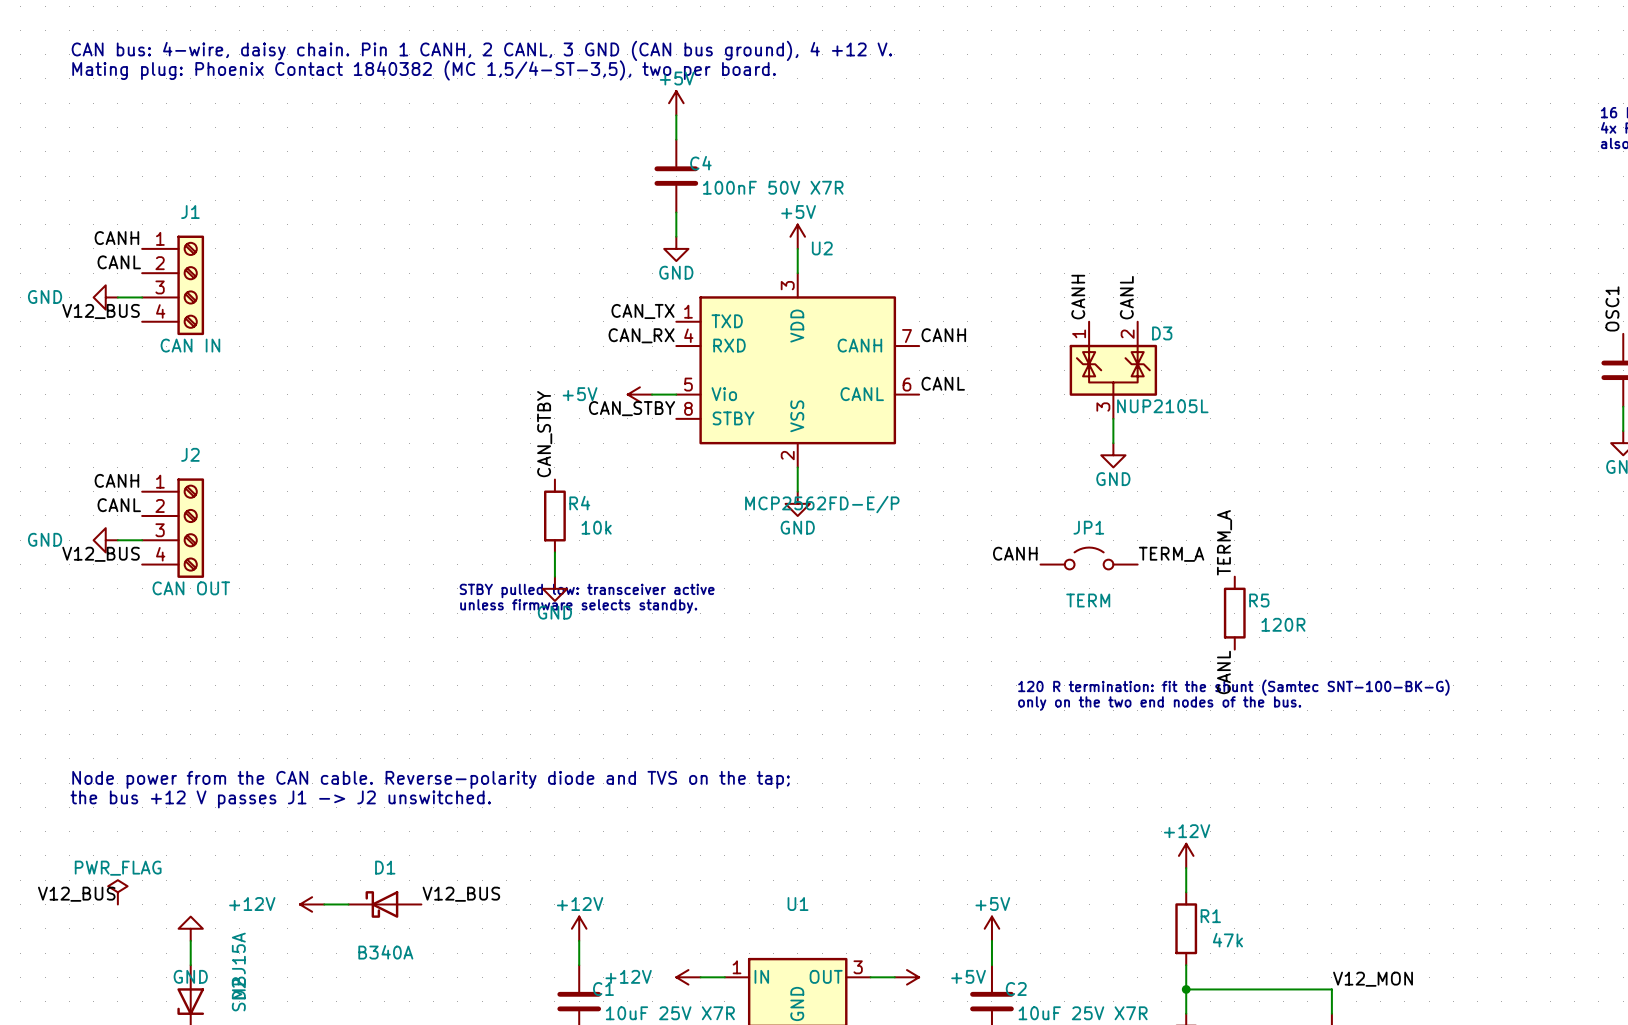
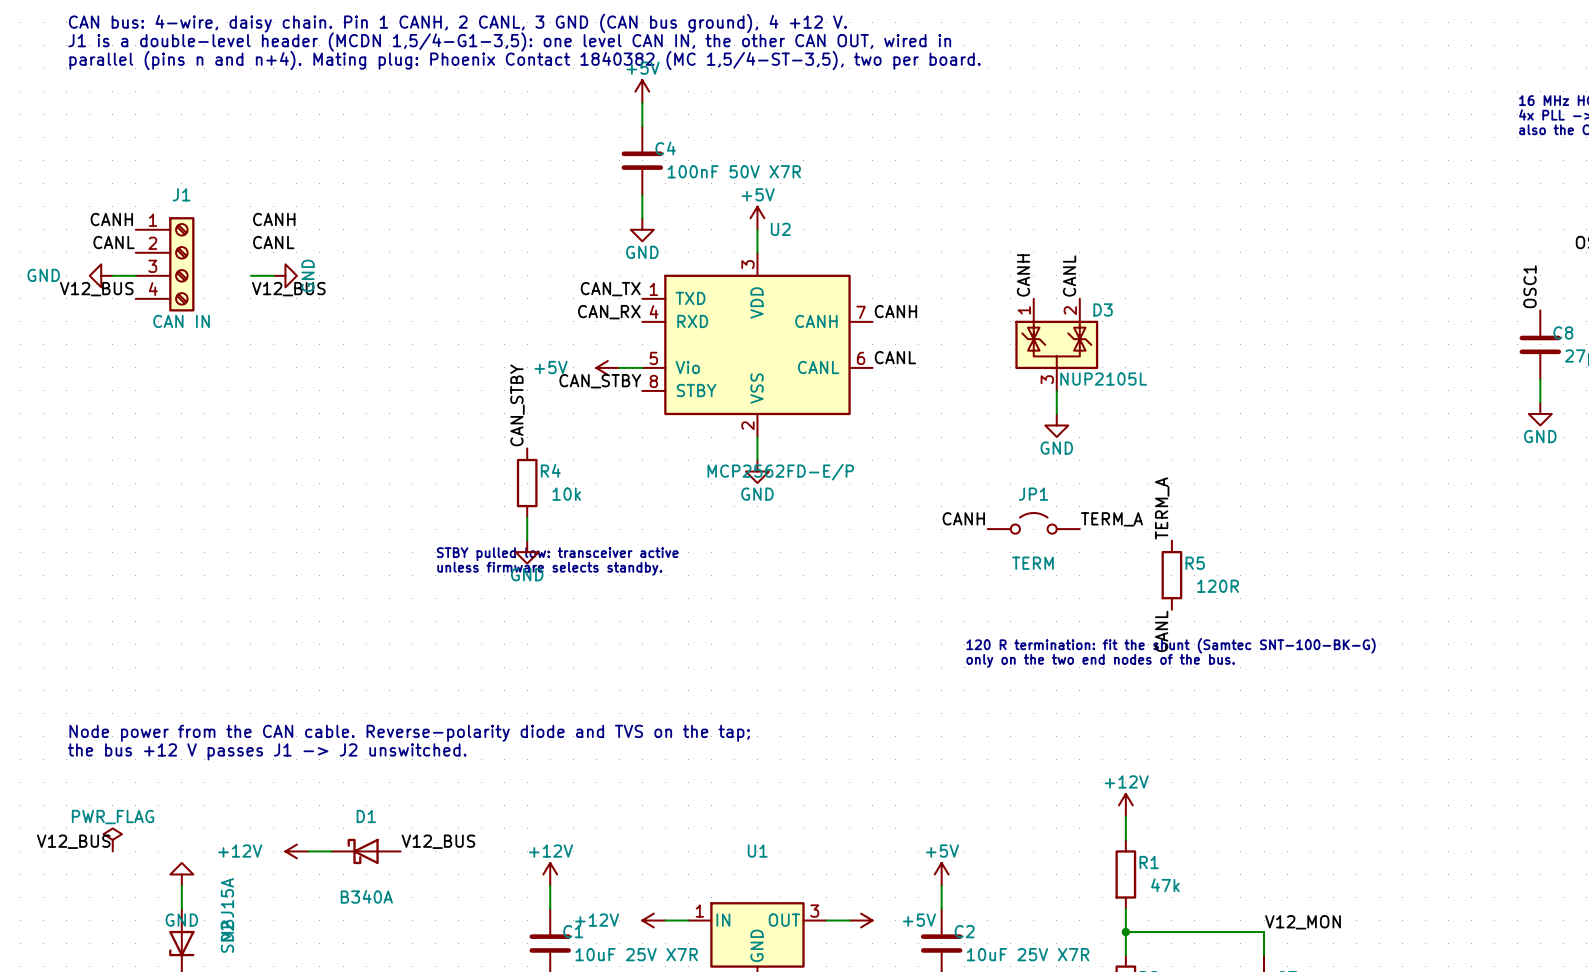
text: none -> CAN bus: 4-wire, daisy chain. Pin 1 CANH, 2 CANL, 3 GND (CAN bus ground), 4 +12 V. (457, 23)
text: CAN bus: 4-wire, daisy chain. Pin 1 CANH, 2 CANL, 3 GND (CAN bus ground), 4 +12 V. (481, 50) -> J1 is a double-level header (MCDN 1,5/4-G1-3,5): one level CAN IN, the other CAN OUT, wired in (509, 42)
text: Mating plug: Phoenix Contact 1840382 (MC 1,5/4-ST-3,5), two per board. (424, 70) -> parallel (pins n and n+4). Mating plug: Phoenix Contact 1840382 (MC 1,5/4-ST-3,5), two per board. (525, 60)
label: none -> CANH (274, 219)
label: none -> CANL (273, 242)
wire: none -> (250, 275) (273, 275)
power symbol: none -> GND (285, 275)
label: none -> V12_BUS (288, 289)
label: CANH (116, 480) -> none
label: CANL (119, 505) -> none
J2: CAN OUT (173, 528) -> none
power symbol: GND (105, 540) -> none
wire: (117, 540) (142, 540) -> none
label: V12_BUS (101, 554) -> none

